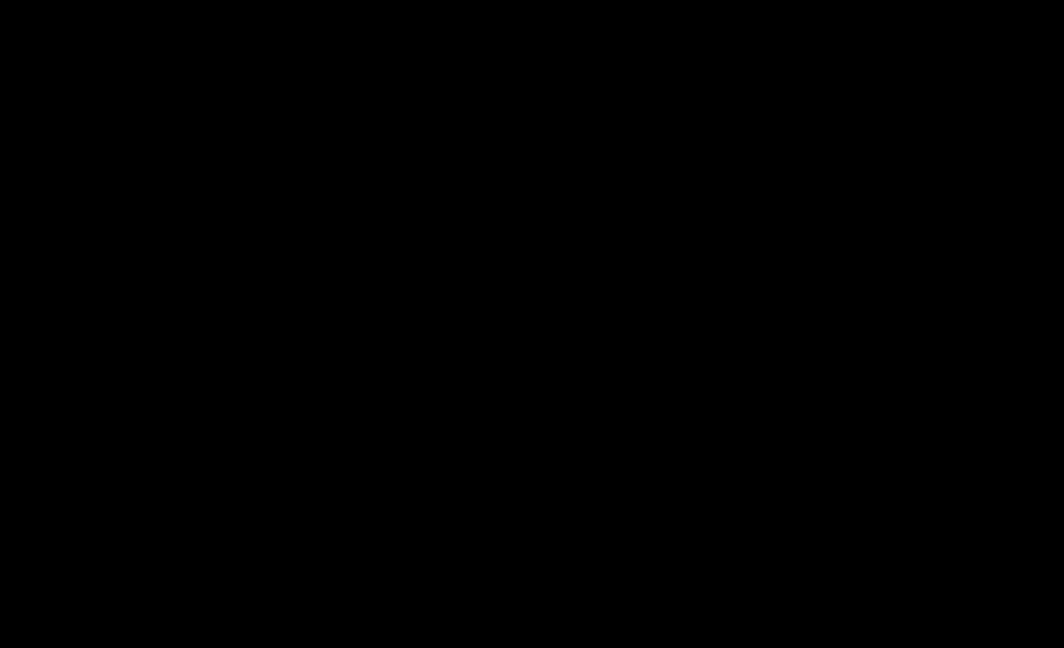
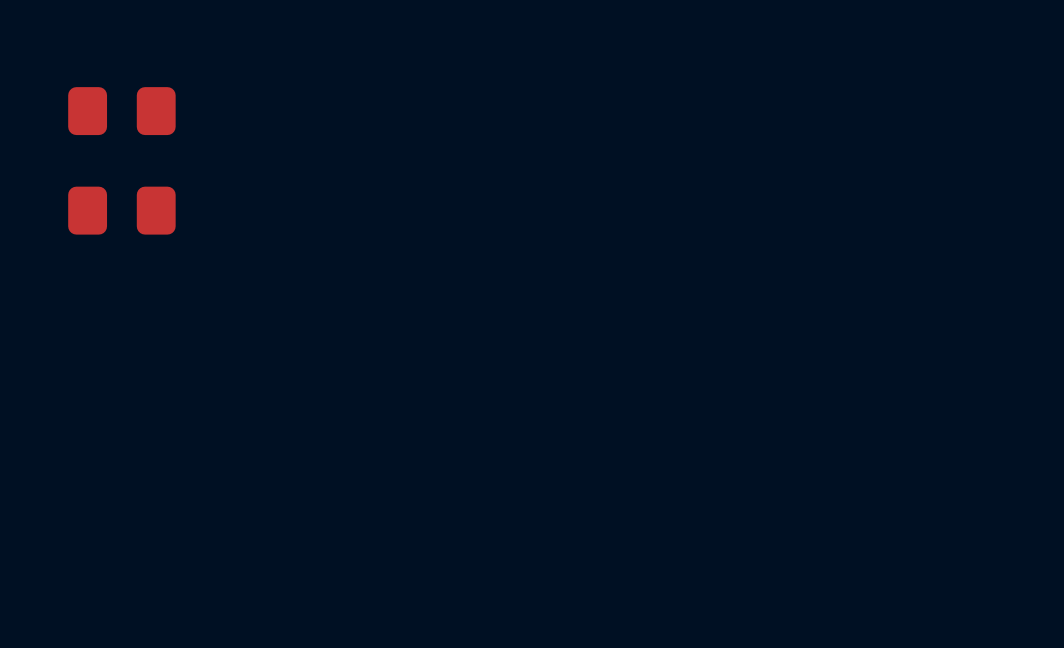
part: none -> (121, 111)
part: none -> (121, 210)

